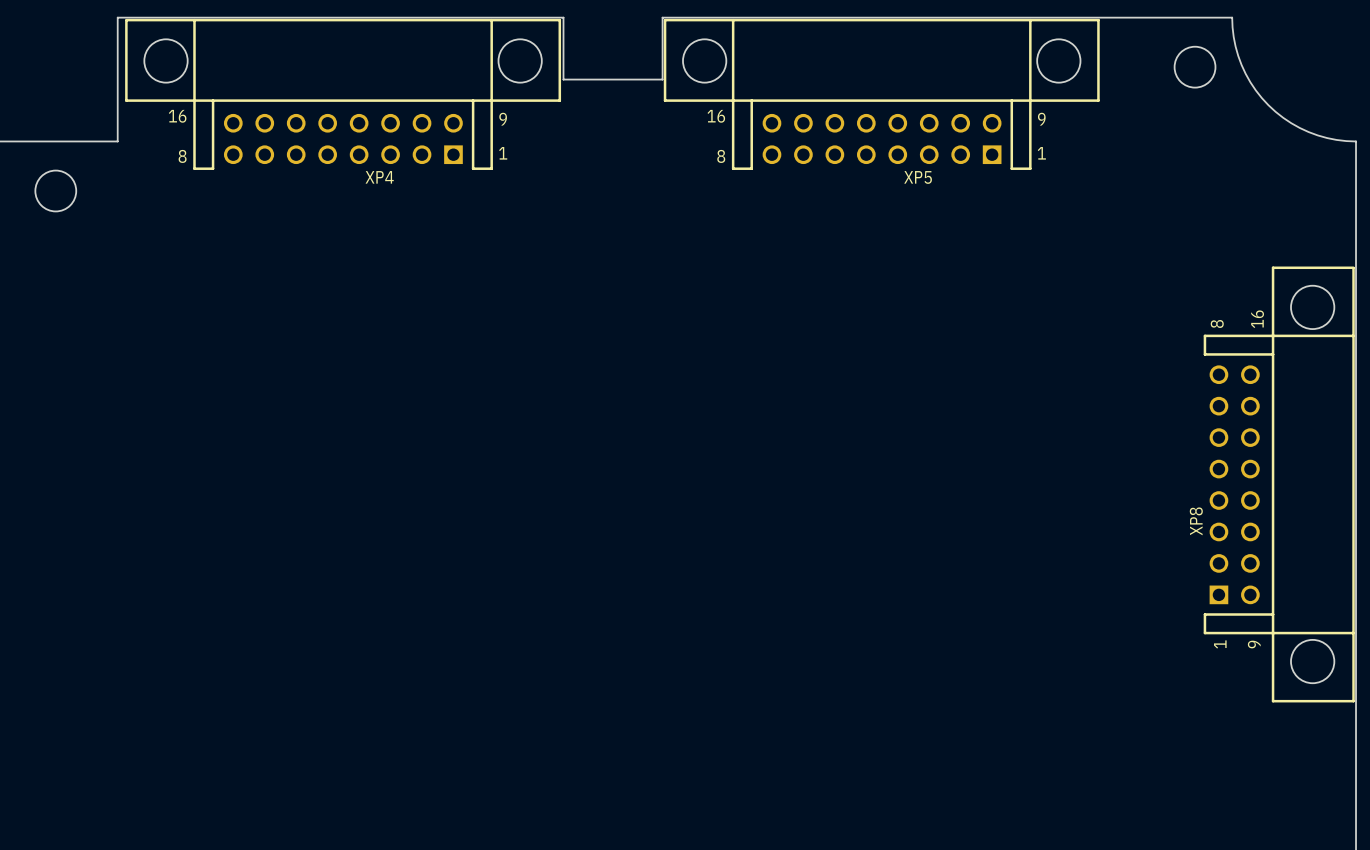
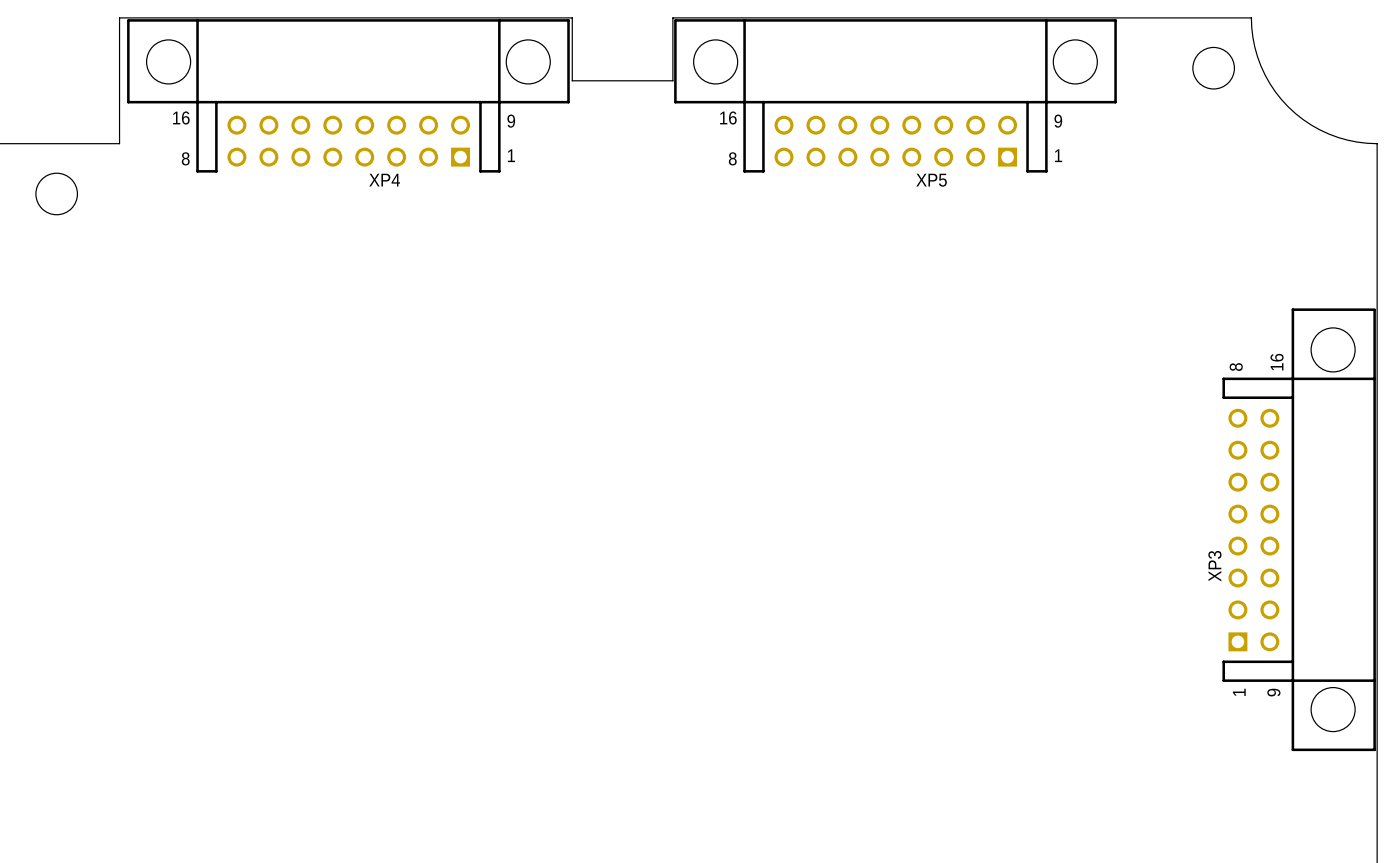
XP8: (1279, 484) -> none
XP3: none -> (1299, 529)

